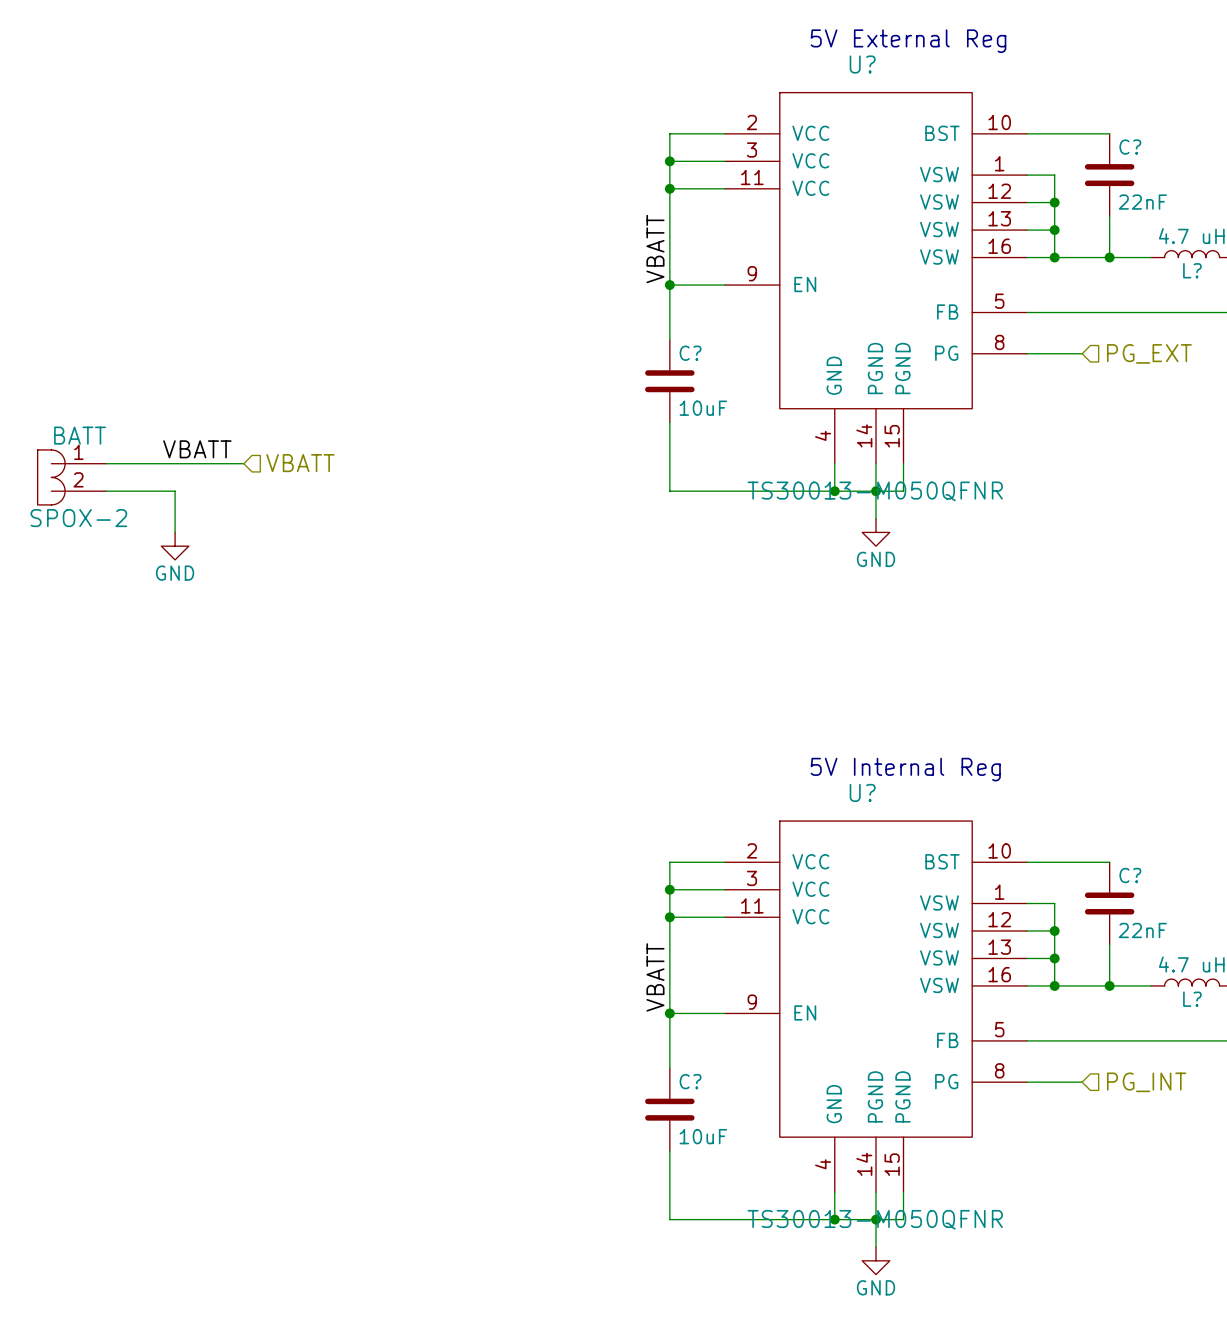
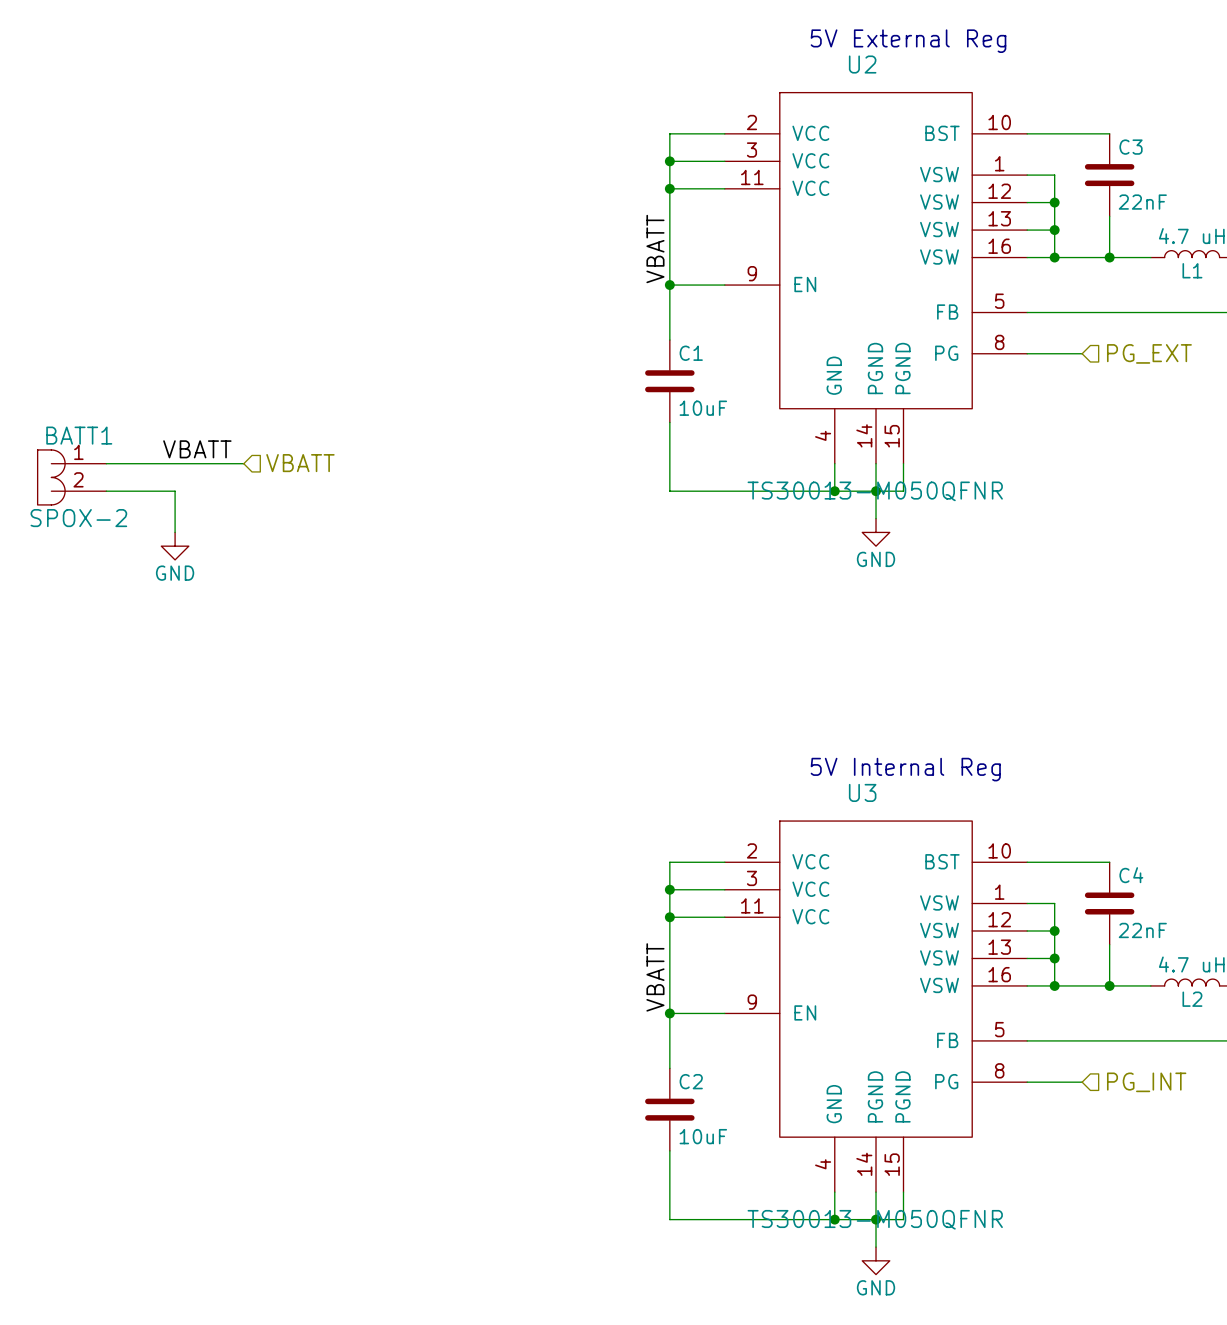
U? name: U? (862, 64) -> U2 (862, 64)
C? name: C? (1130, 147) -> C3 (1131, 147)
L? name: L? (1192, 270) -> L1 (1192, 270)
C? name: C? (690, 353) -> C1 (691, 353)
BATT name: BATT (80, 435) -> BATT1 (79, 435)
U? name: U? (862, 792) -> U3 (862, 792)
C? name: C? (1130, 875) -> C4 (1131, 875)
L? name: L? (1192, 999) -> L2 (1192, 999)
C? name: C? (690, 1081) -> C2 (691, 1081)

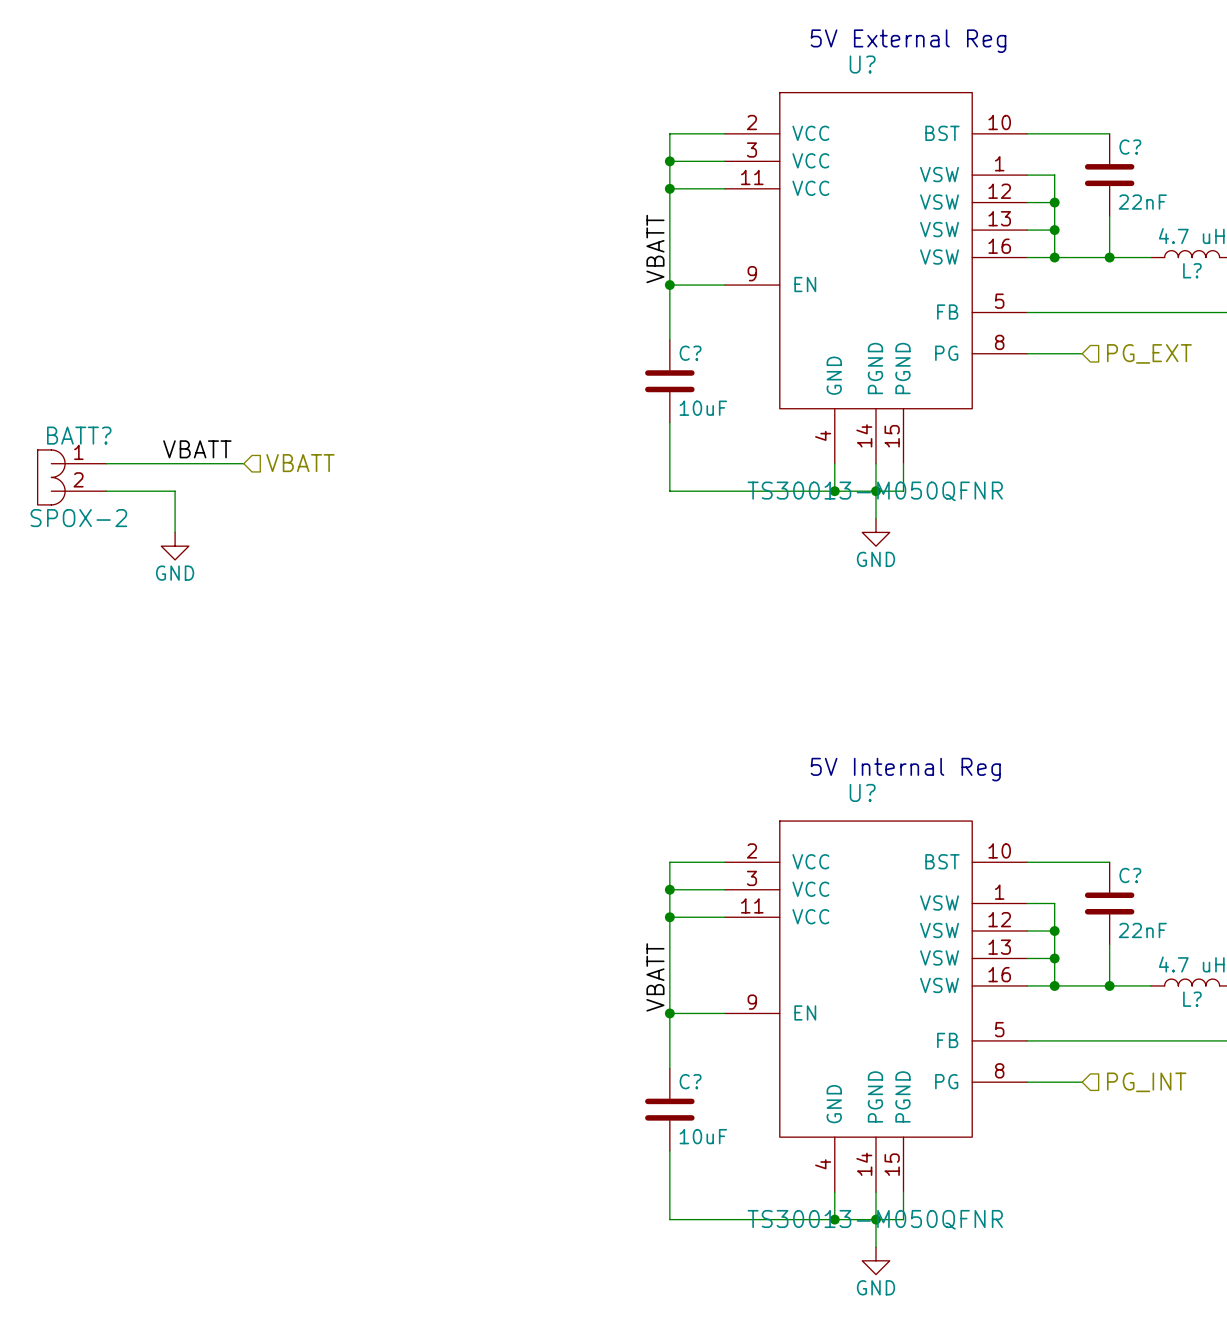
U2 name: U2 (862, 64) -> U? (862, 64)
C3 name: C3 (1131, 147) -> C? (1130, 147)
L1 name: L1 (1192, 270) -> L? (1192, 270)
C1 name: C1 (691, 353) -> C? (690, 353)
BATT1 name: BATT1 (79, 435) -> BATT? (79, 435)
U3 name: U3 (862, 792) -> U? (862, 792)
C4 name: C4 (1131, 875) -> C? (1130, 875)
L2 name: L2 (1192, 999) -> L? (1192, 999)
C2 name: C2 (691, 1081) -> C? (690, 1081)

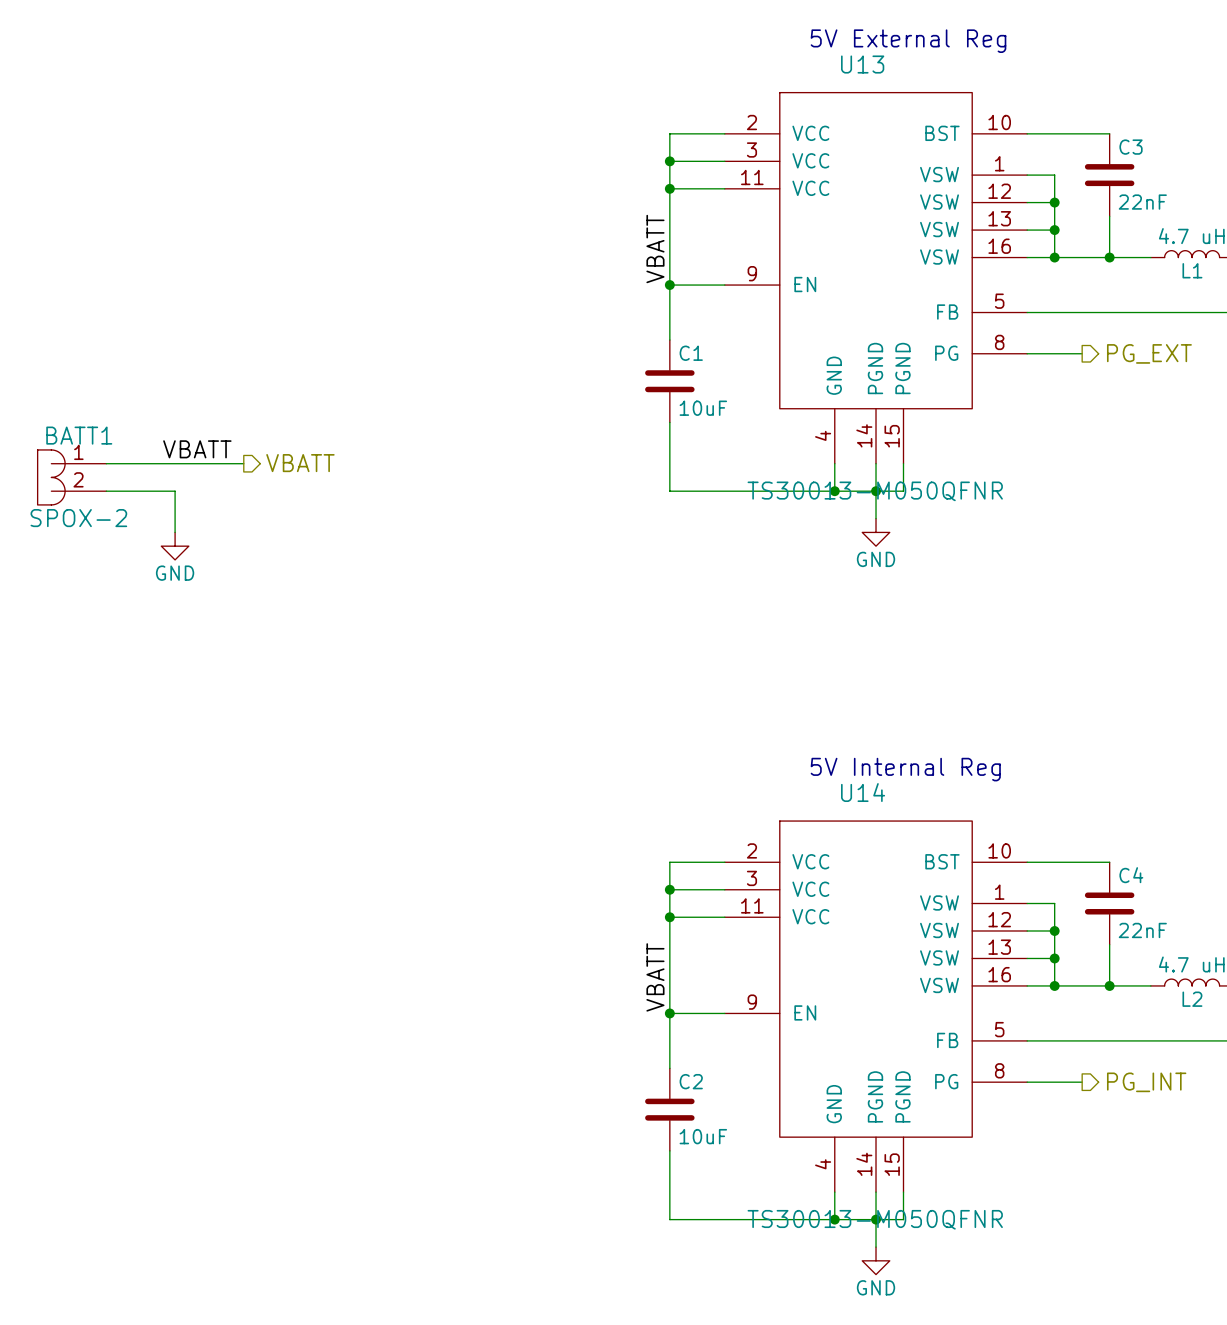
U? name: U? (862, 64) -> U13 (862, 64)
C? name: C? (1130, 147) -> C3 (1131, 147)
L? name: L? (1192, 270) -> L1 (1192, 270)
C? name: C? (690, 353) -> C1 (691, 353)
hierarchical label shape: input (1149, 353) -> output (1149, 353)
BATT? name: BATT? (79, 435) -> BATT1 (79, 435)
hierarchical label shape: input (300, 463) -> output (300, 463)
U? name: U? (862, 792) -> U14 (863, 792)
C? name: C? (1130, 875) -> C4 (1131, 875)
L? name: L? (1192, 999) -> L2 (1192, 999)
C? name: C? (690, 1081) -> C2 (691, 1081)
hierarchical label shape: input (1146, 1082) -> output (1146, 1082)

